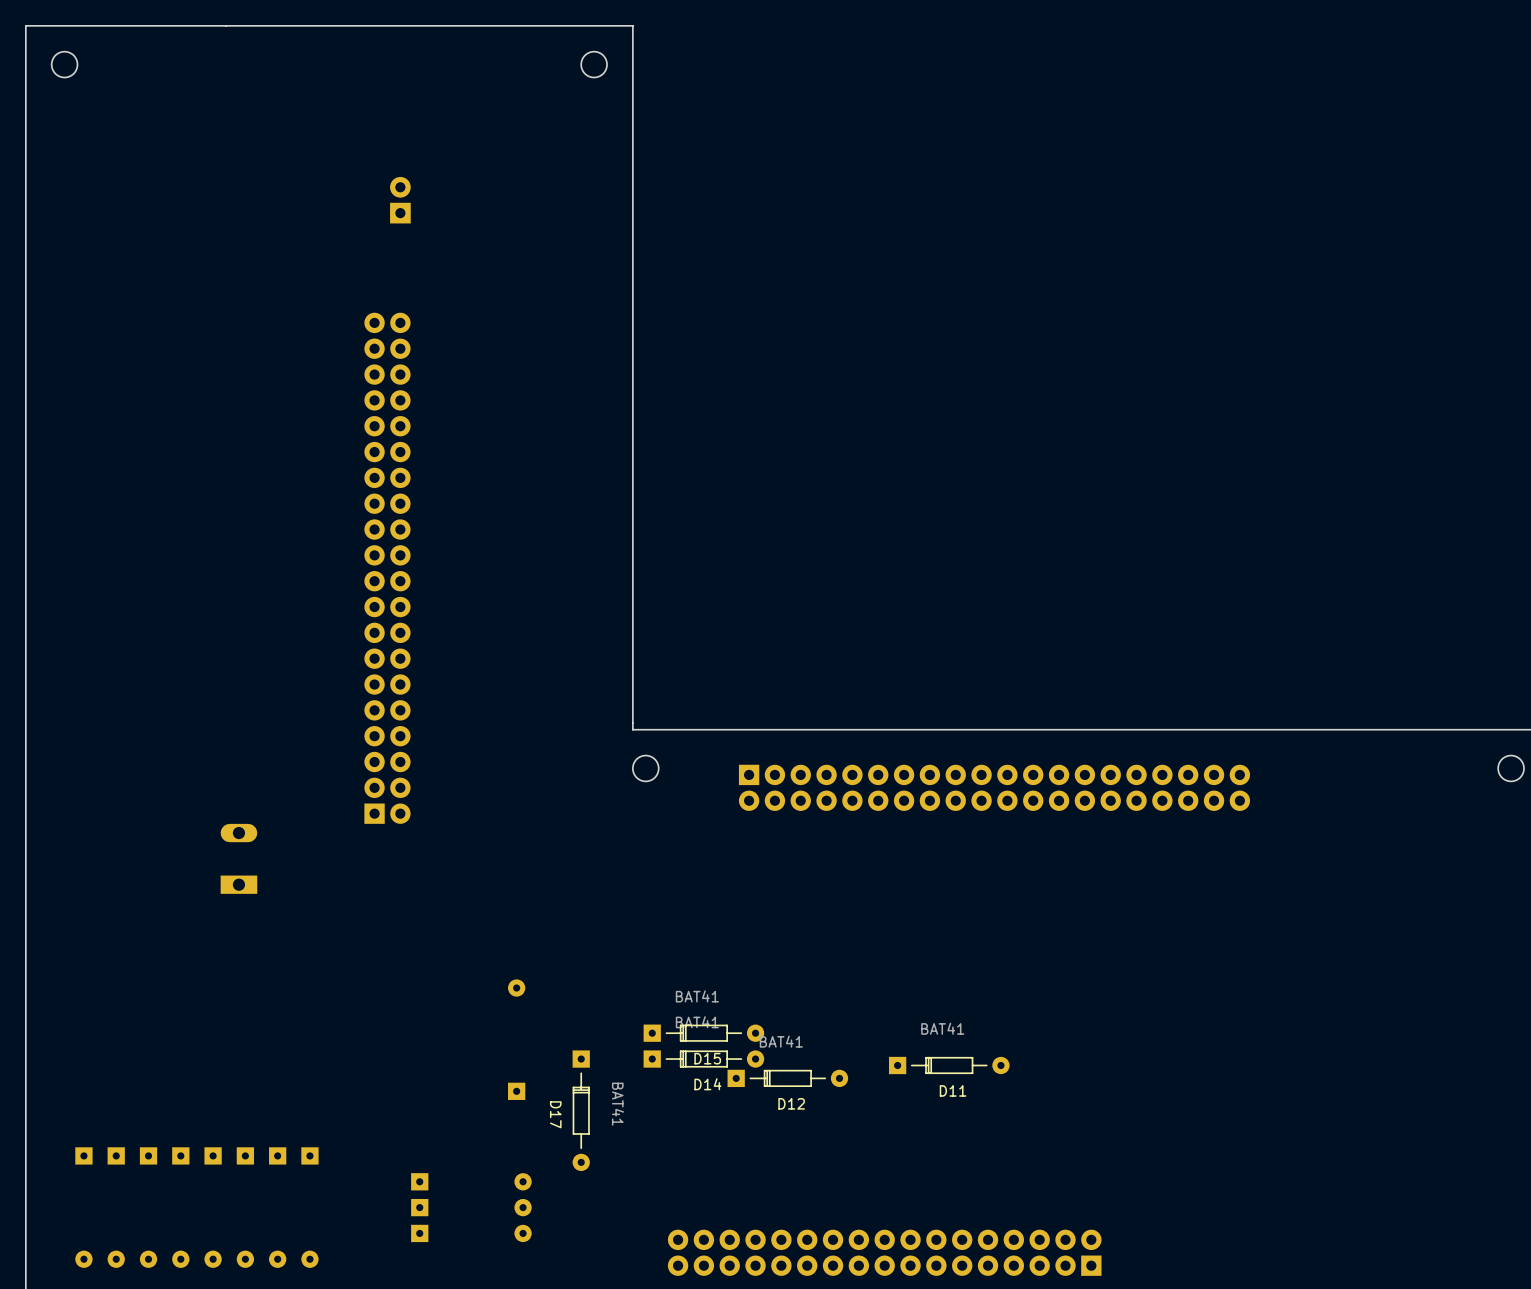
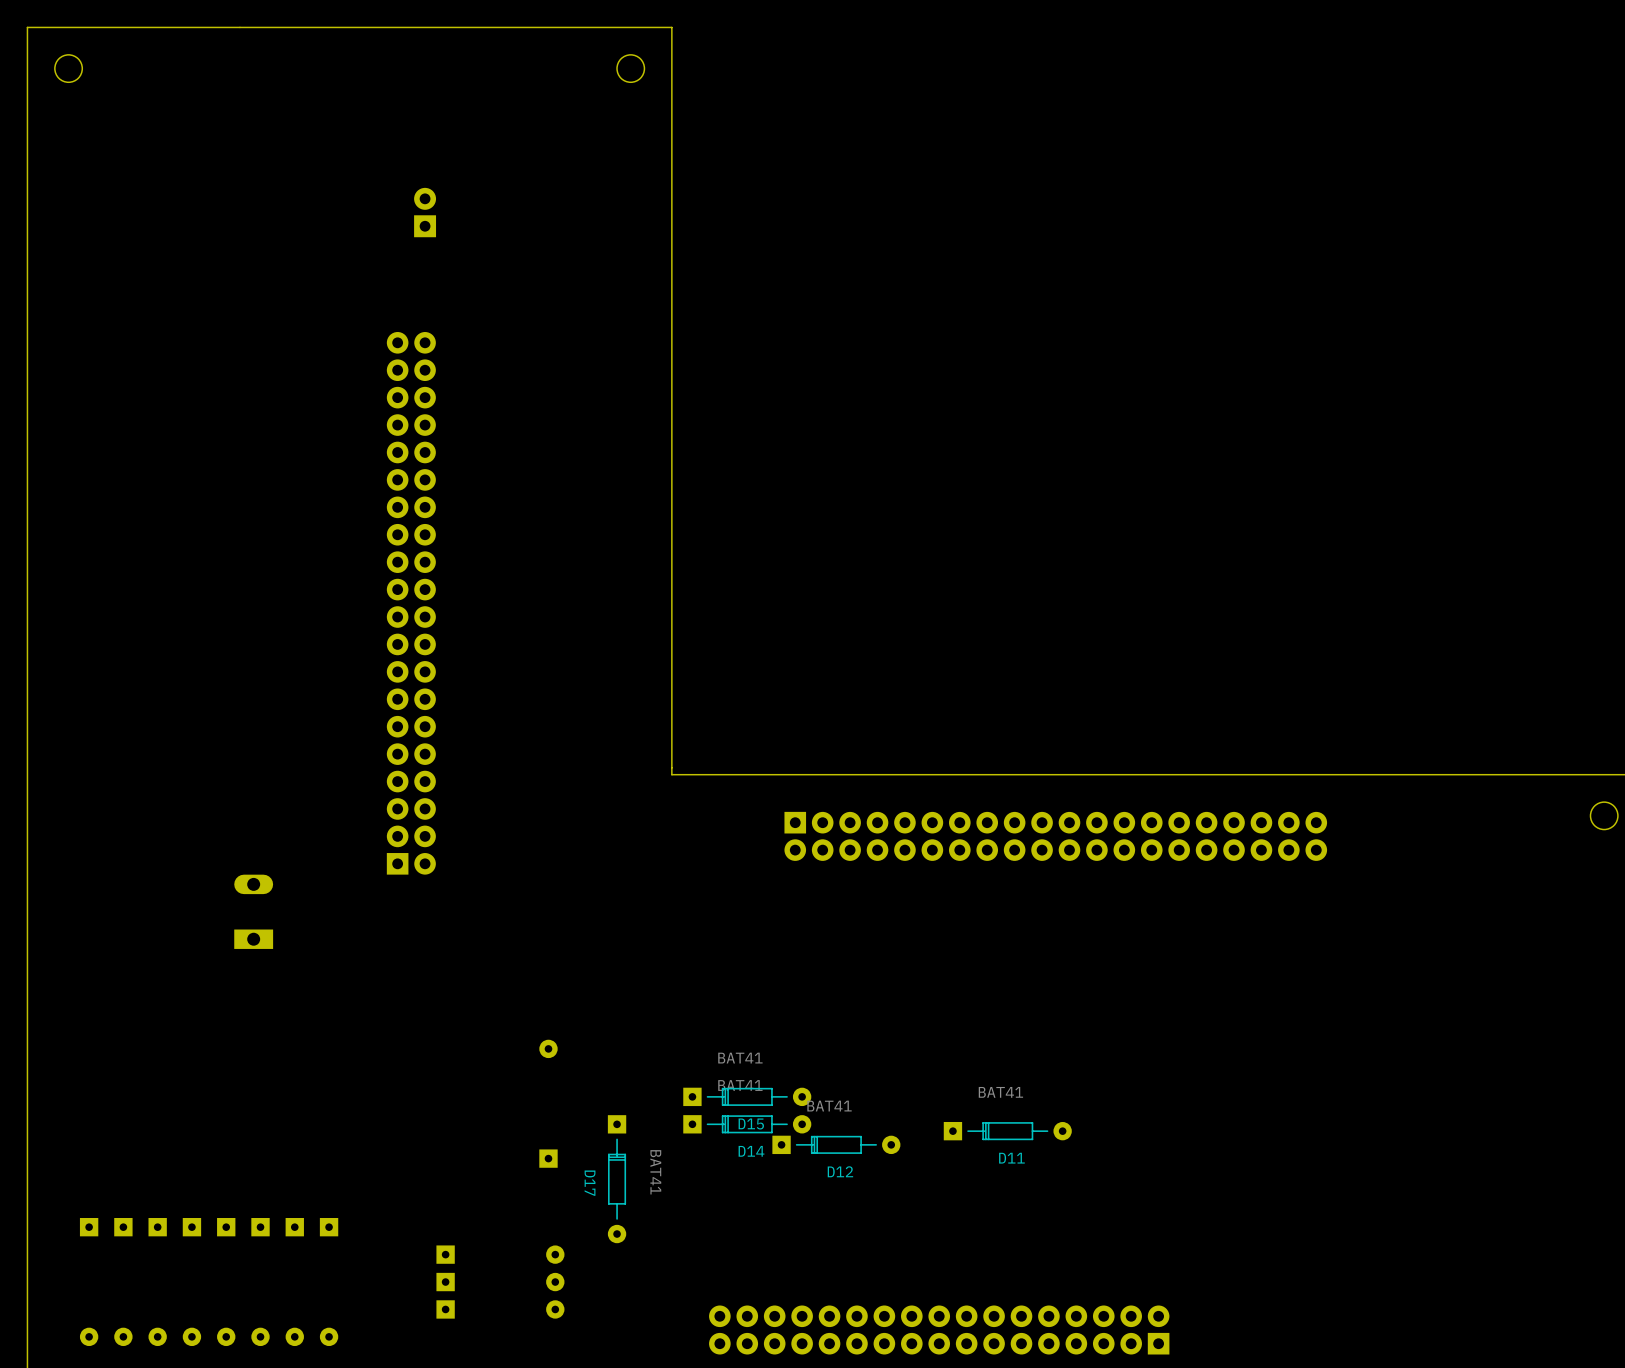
round board edge: [632, 755, 660, 782] -> none

